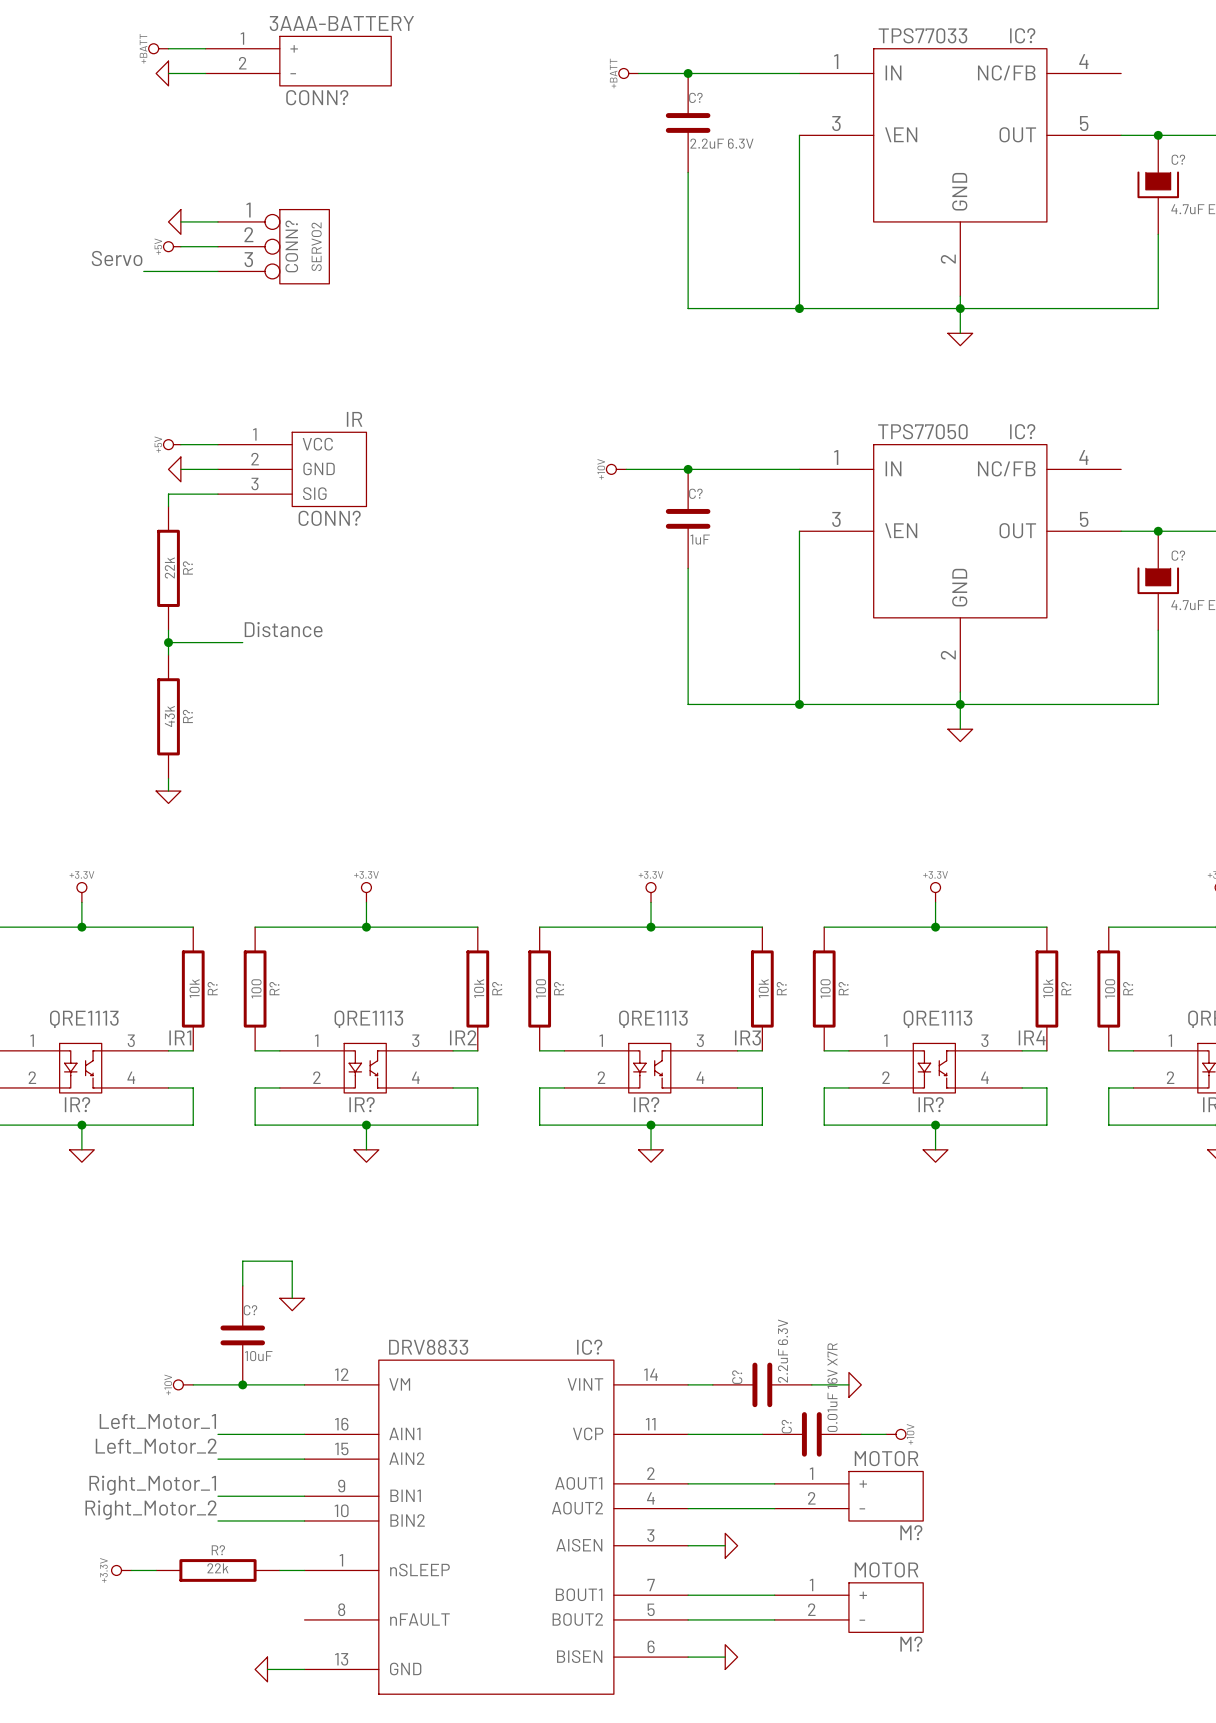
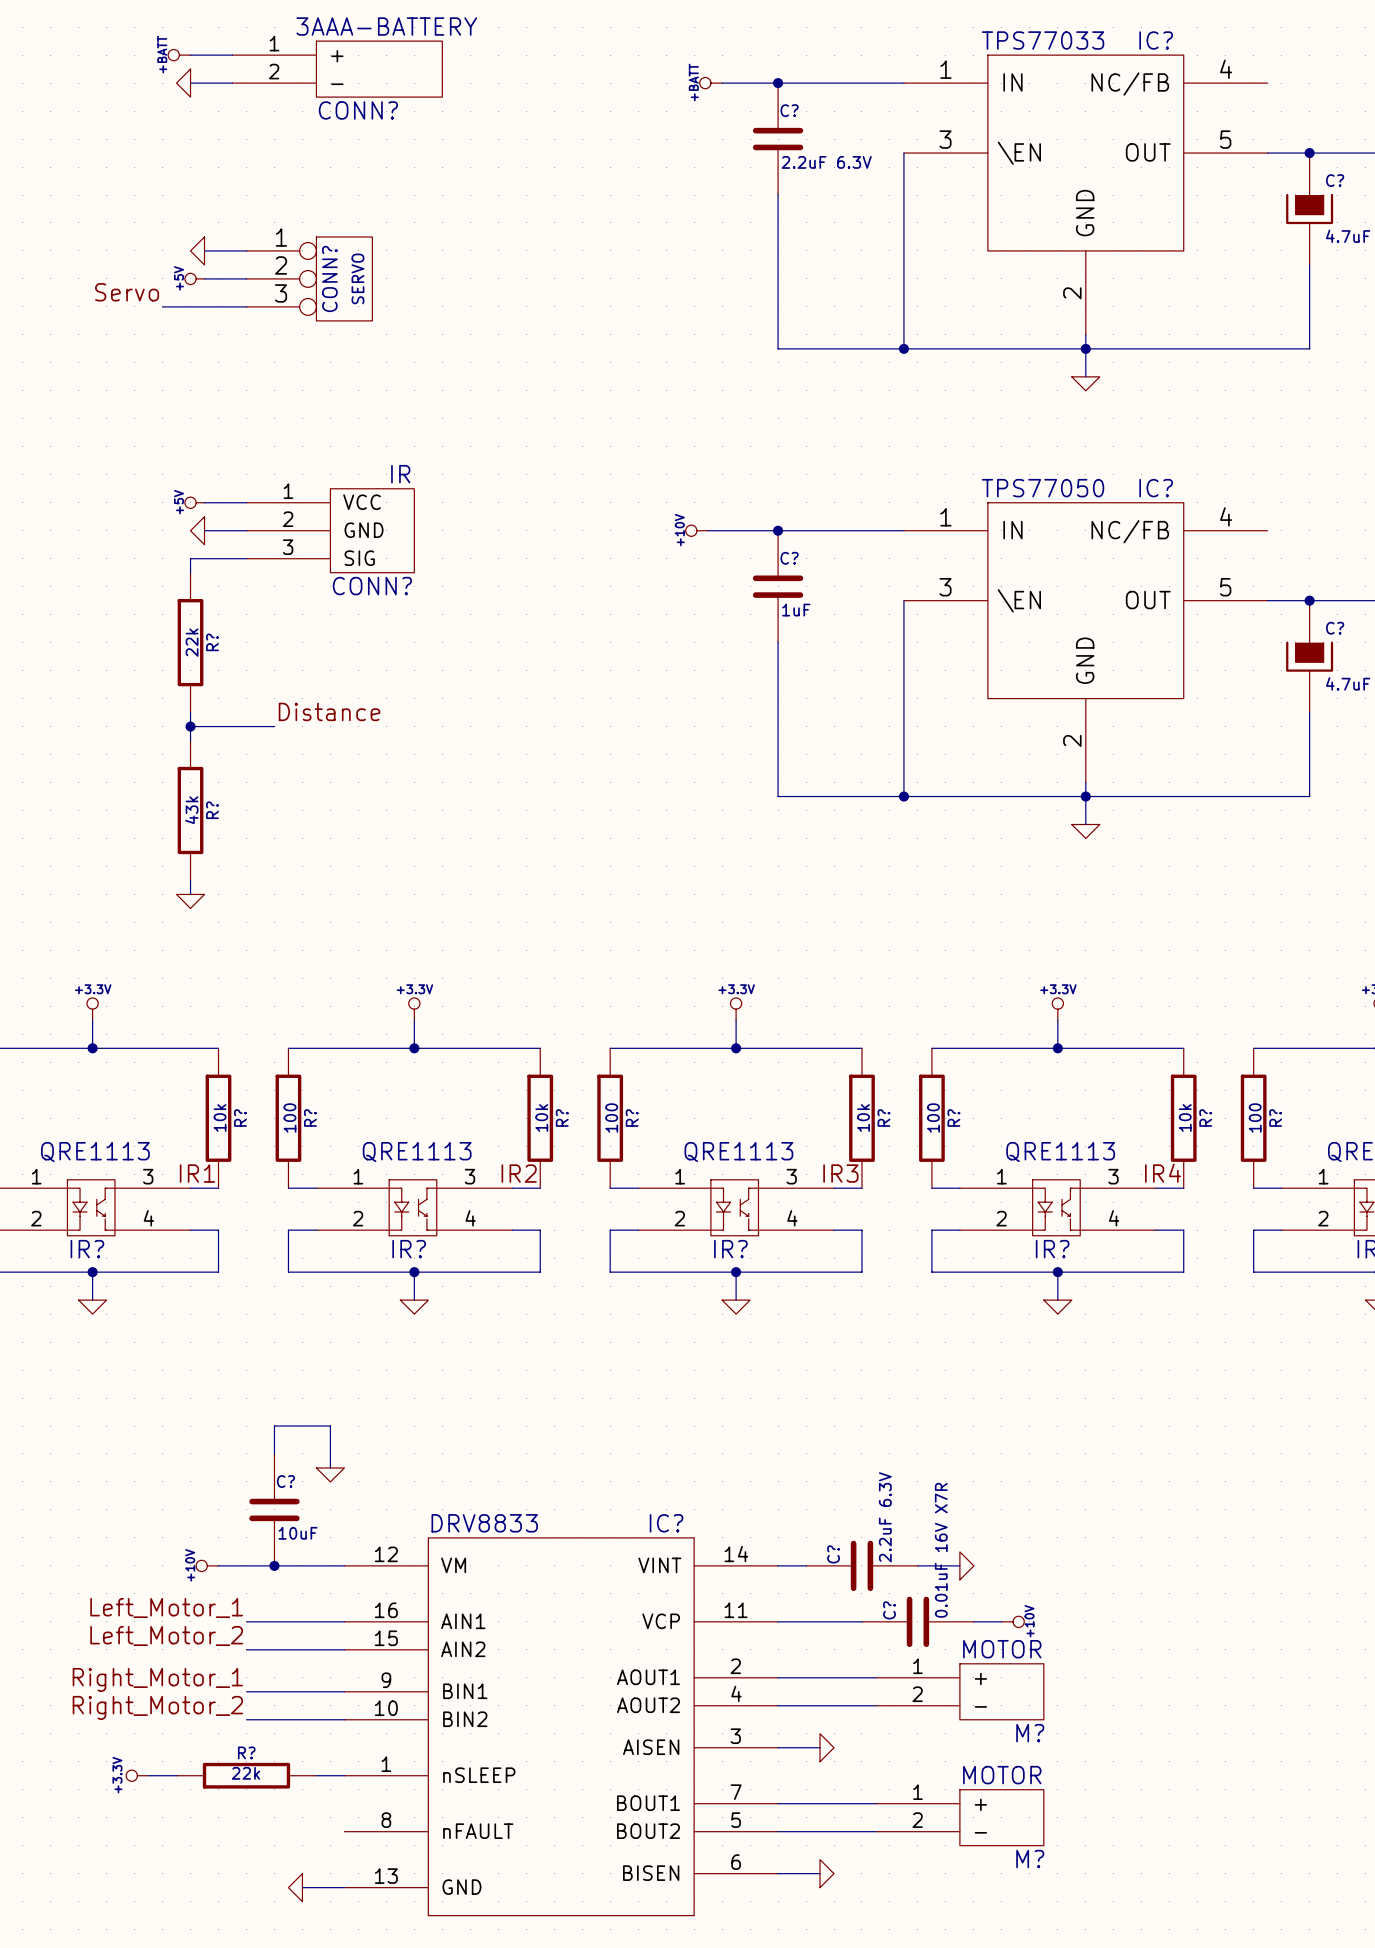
CONN? value: SERVO2 (316, 246) -> SERVO (357, 278)

